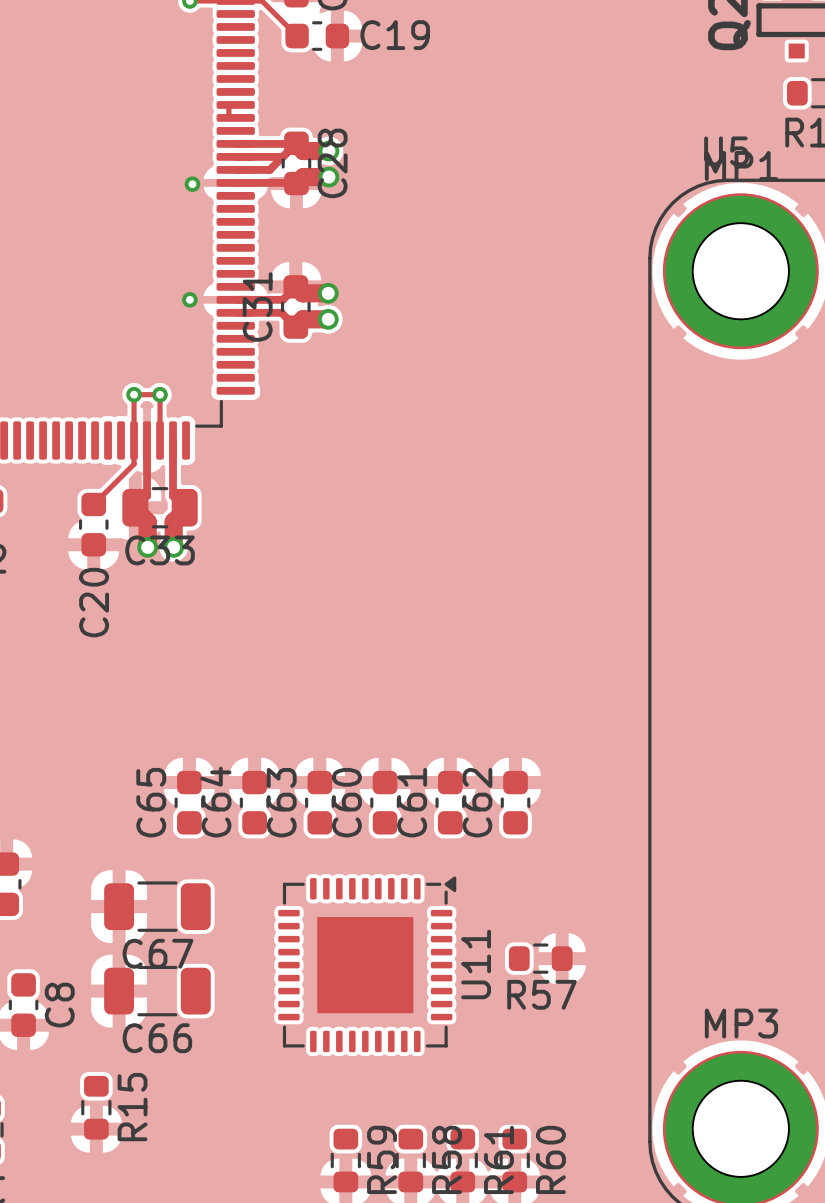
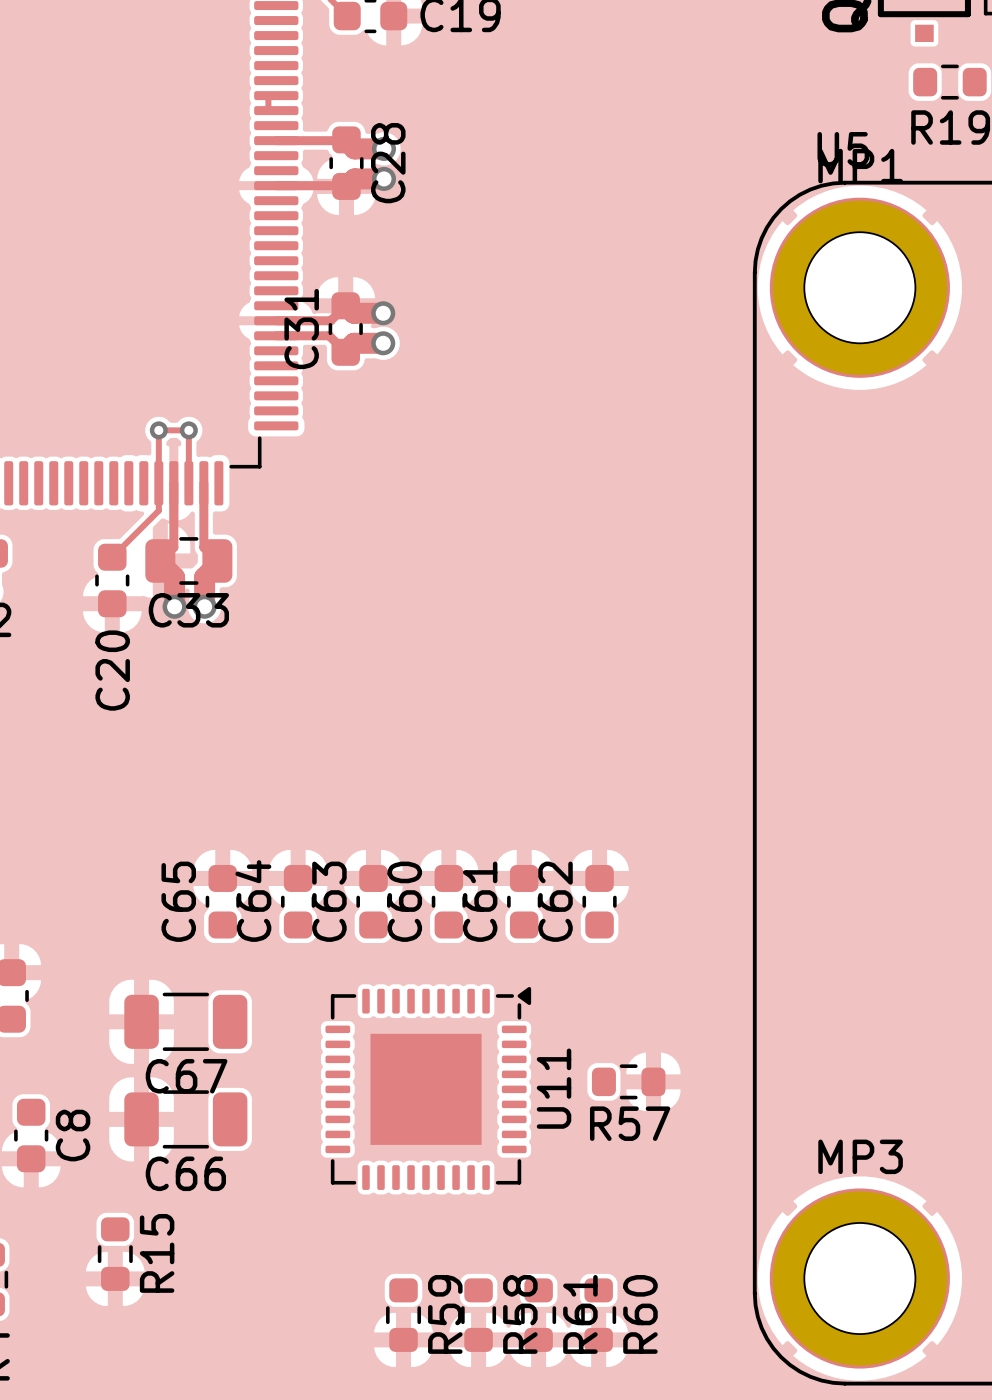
top track: (295, 143) (269, 169) (235, 169) -> none
top track: (235, 156) (282, 156) -> none
via: (192, 184) -> none
via: (189, 299) -> none

